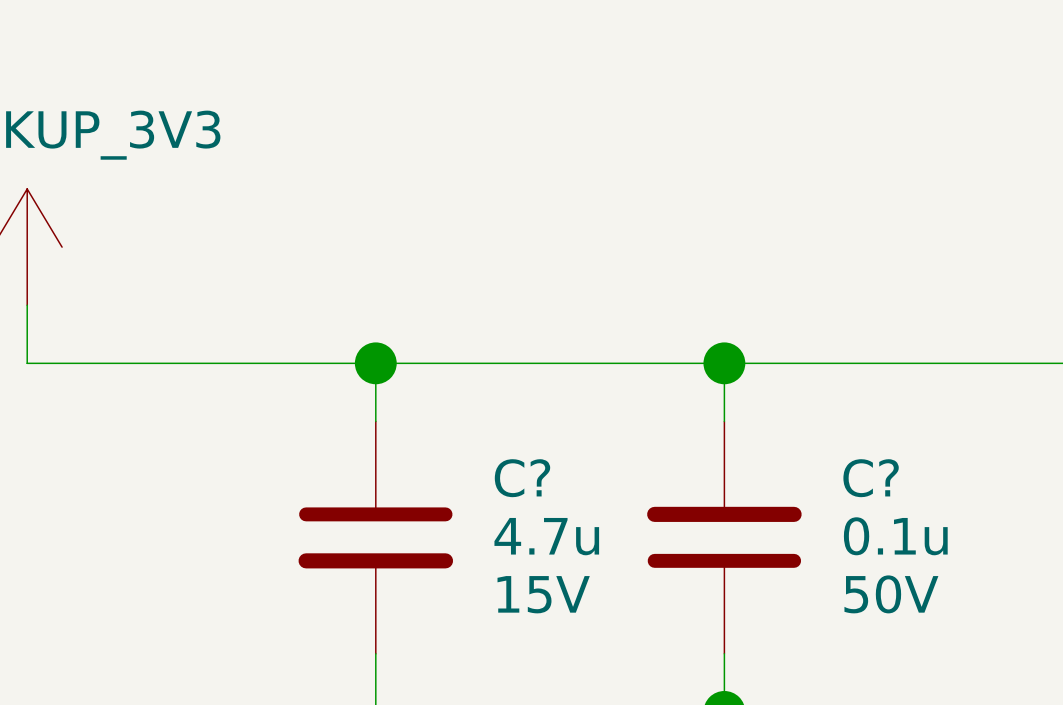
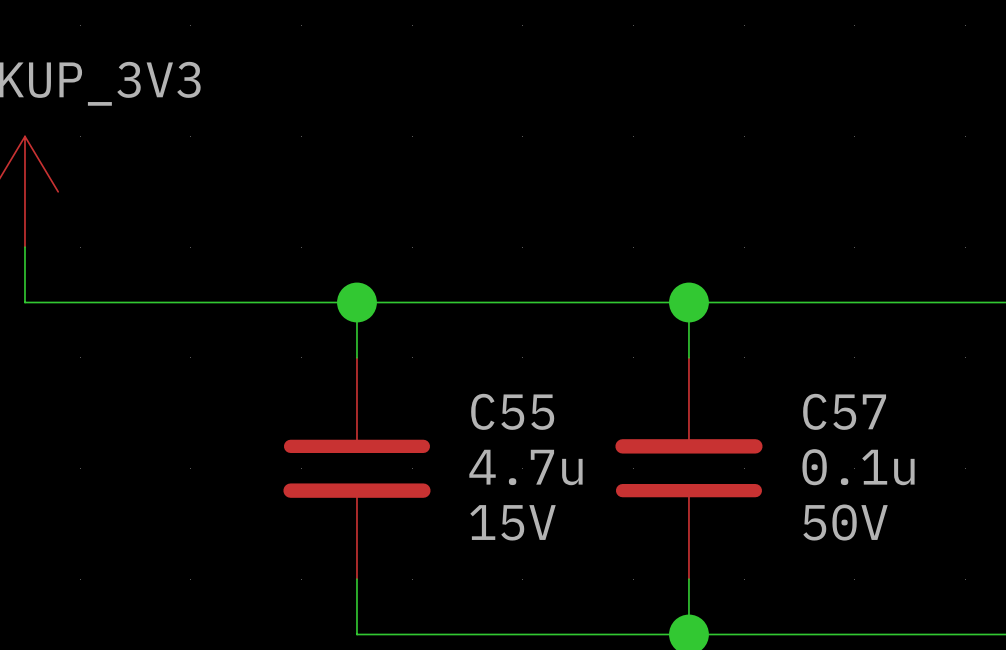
C? name: C? (522, 478) -> C55 (512, 411)
C? name: C? (871, 478) -> C57 (844, 411)

